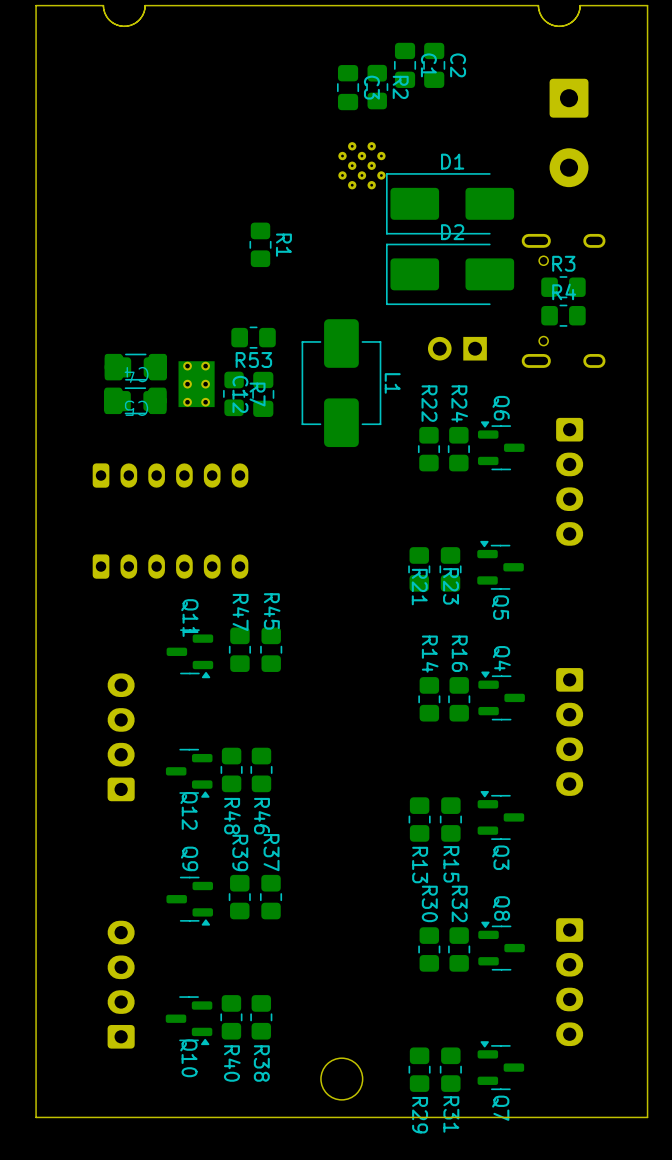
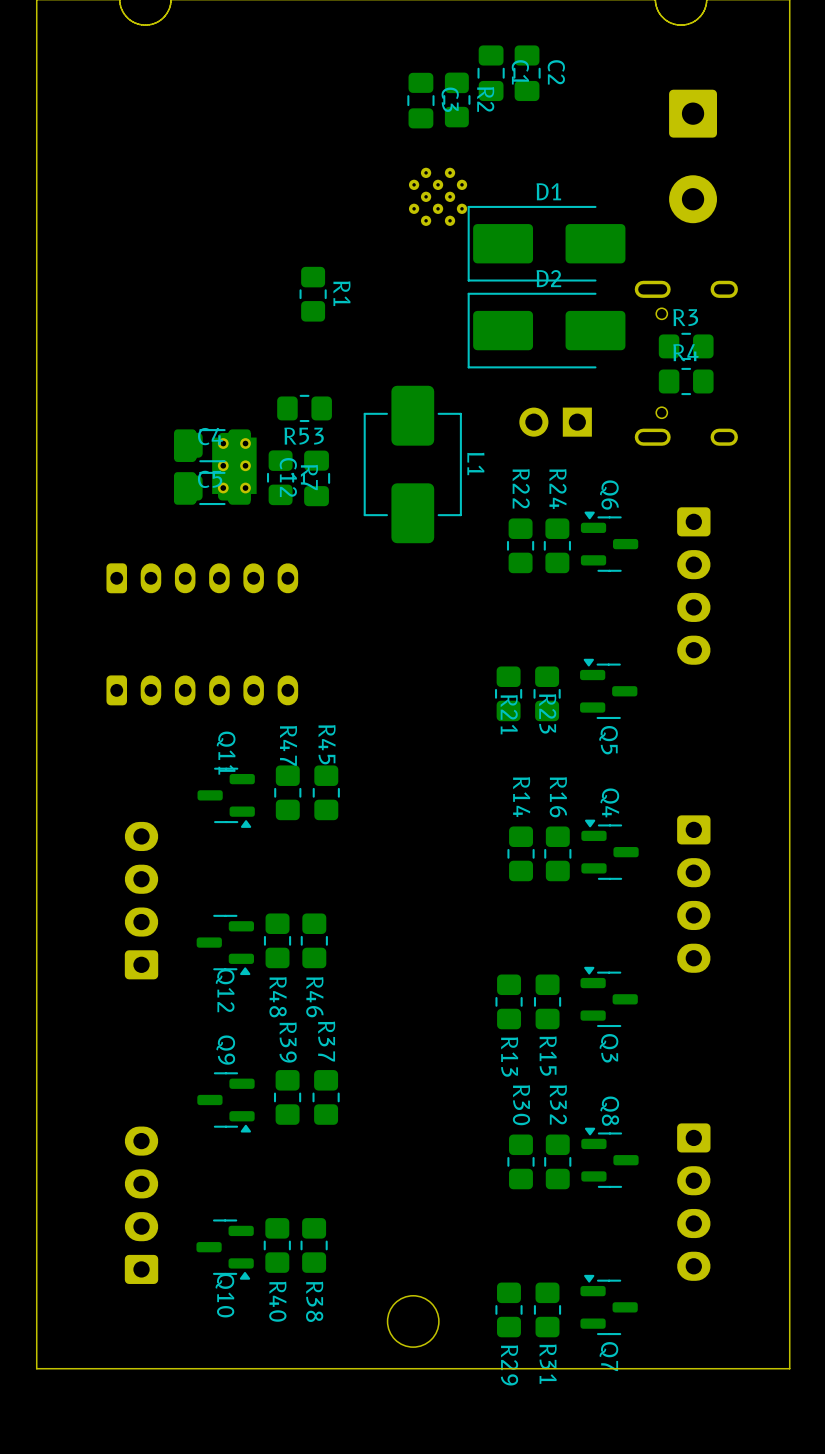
C4 rotation: 0° (135, 367) -> 180° (212, 445)
C4 position: (135, 367) -> (212, 445)
C5 rotation: 0° (135, 400) -> 180° (212, 488)
C5 position: (135, 400) -> (212, 488)

